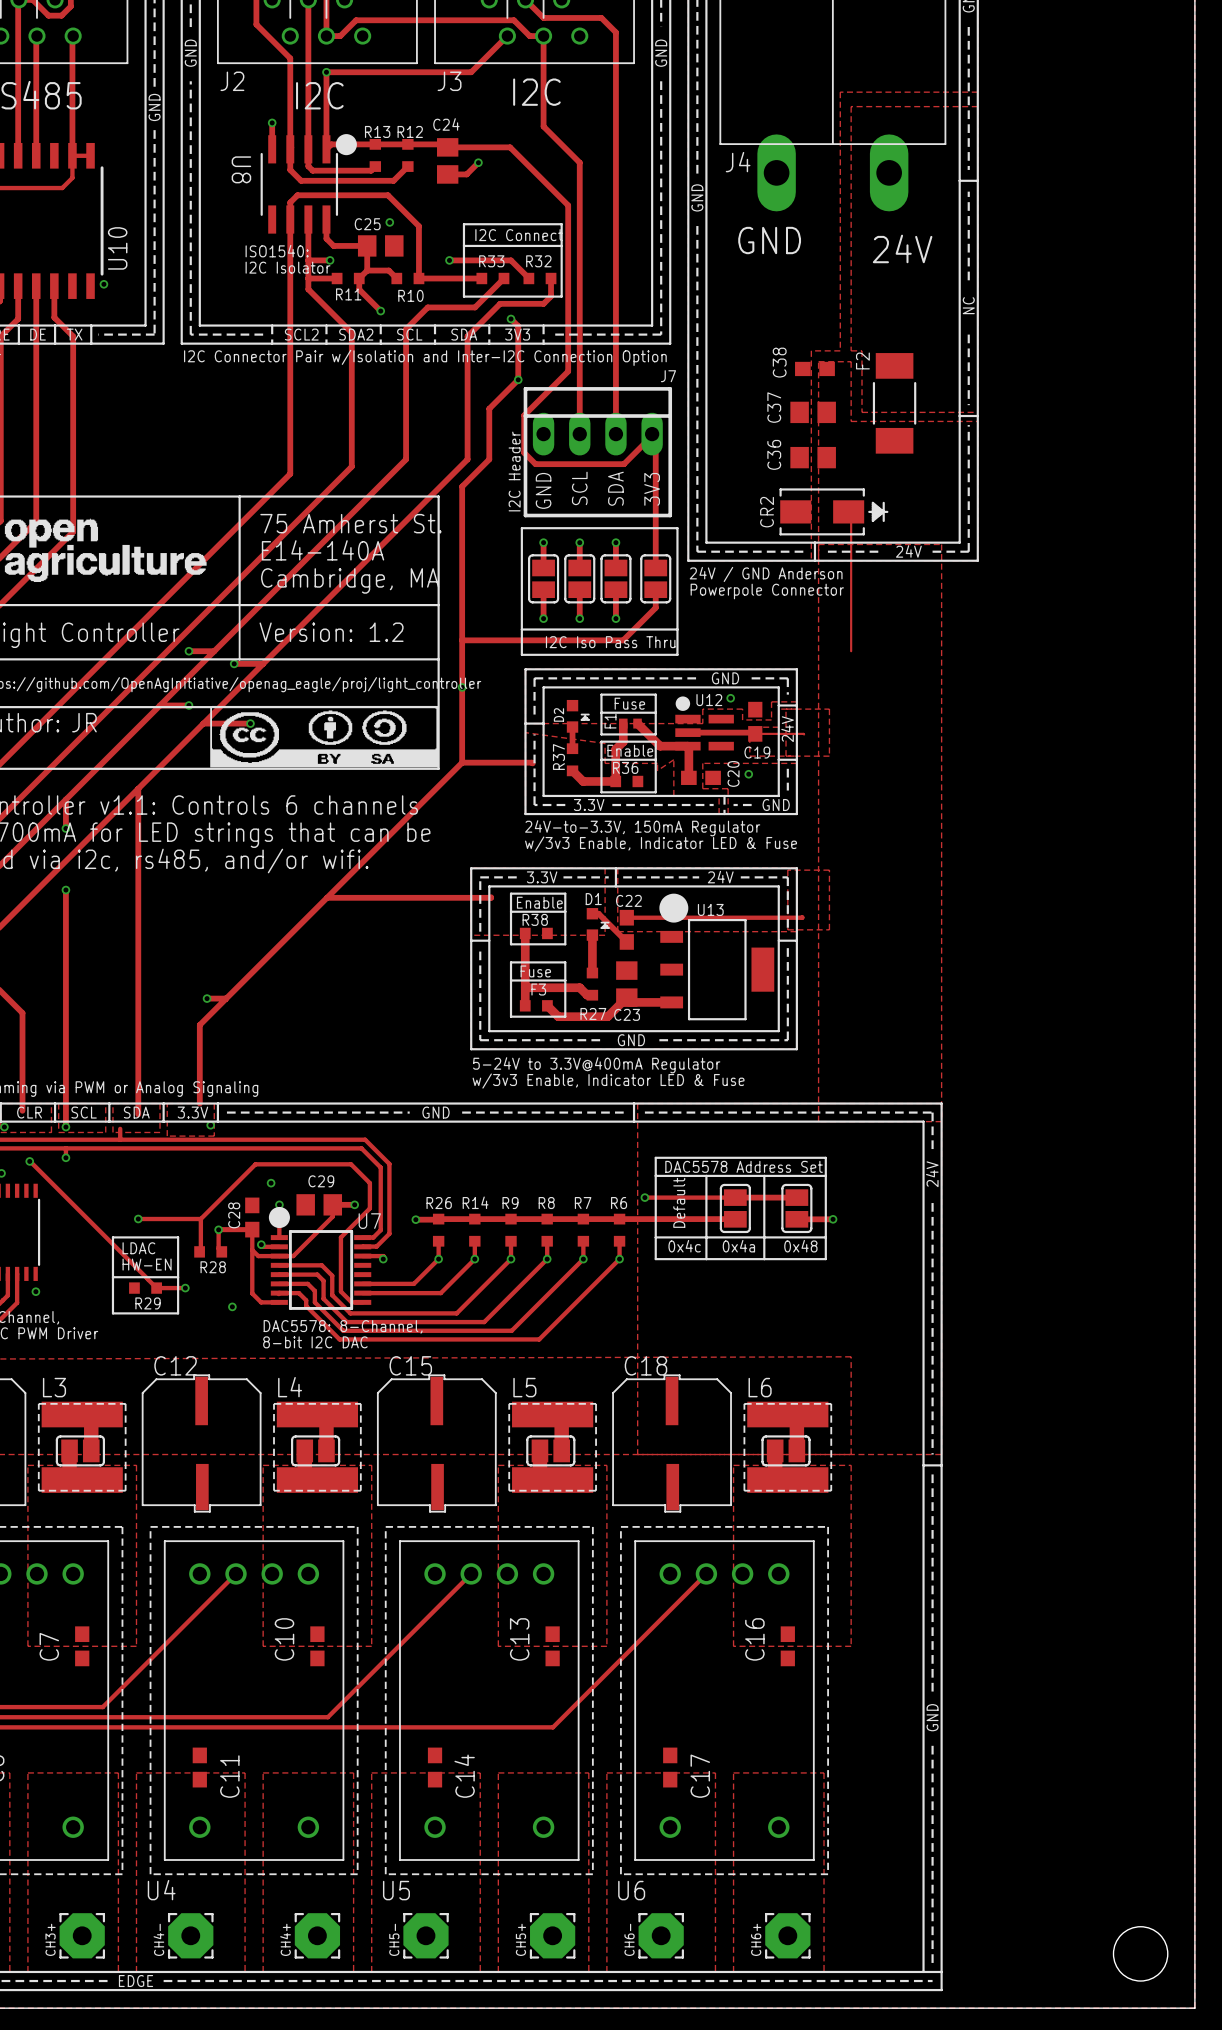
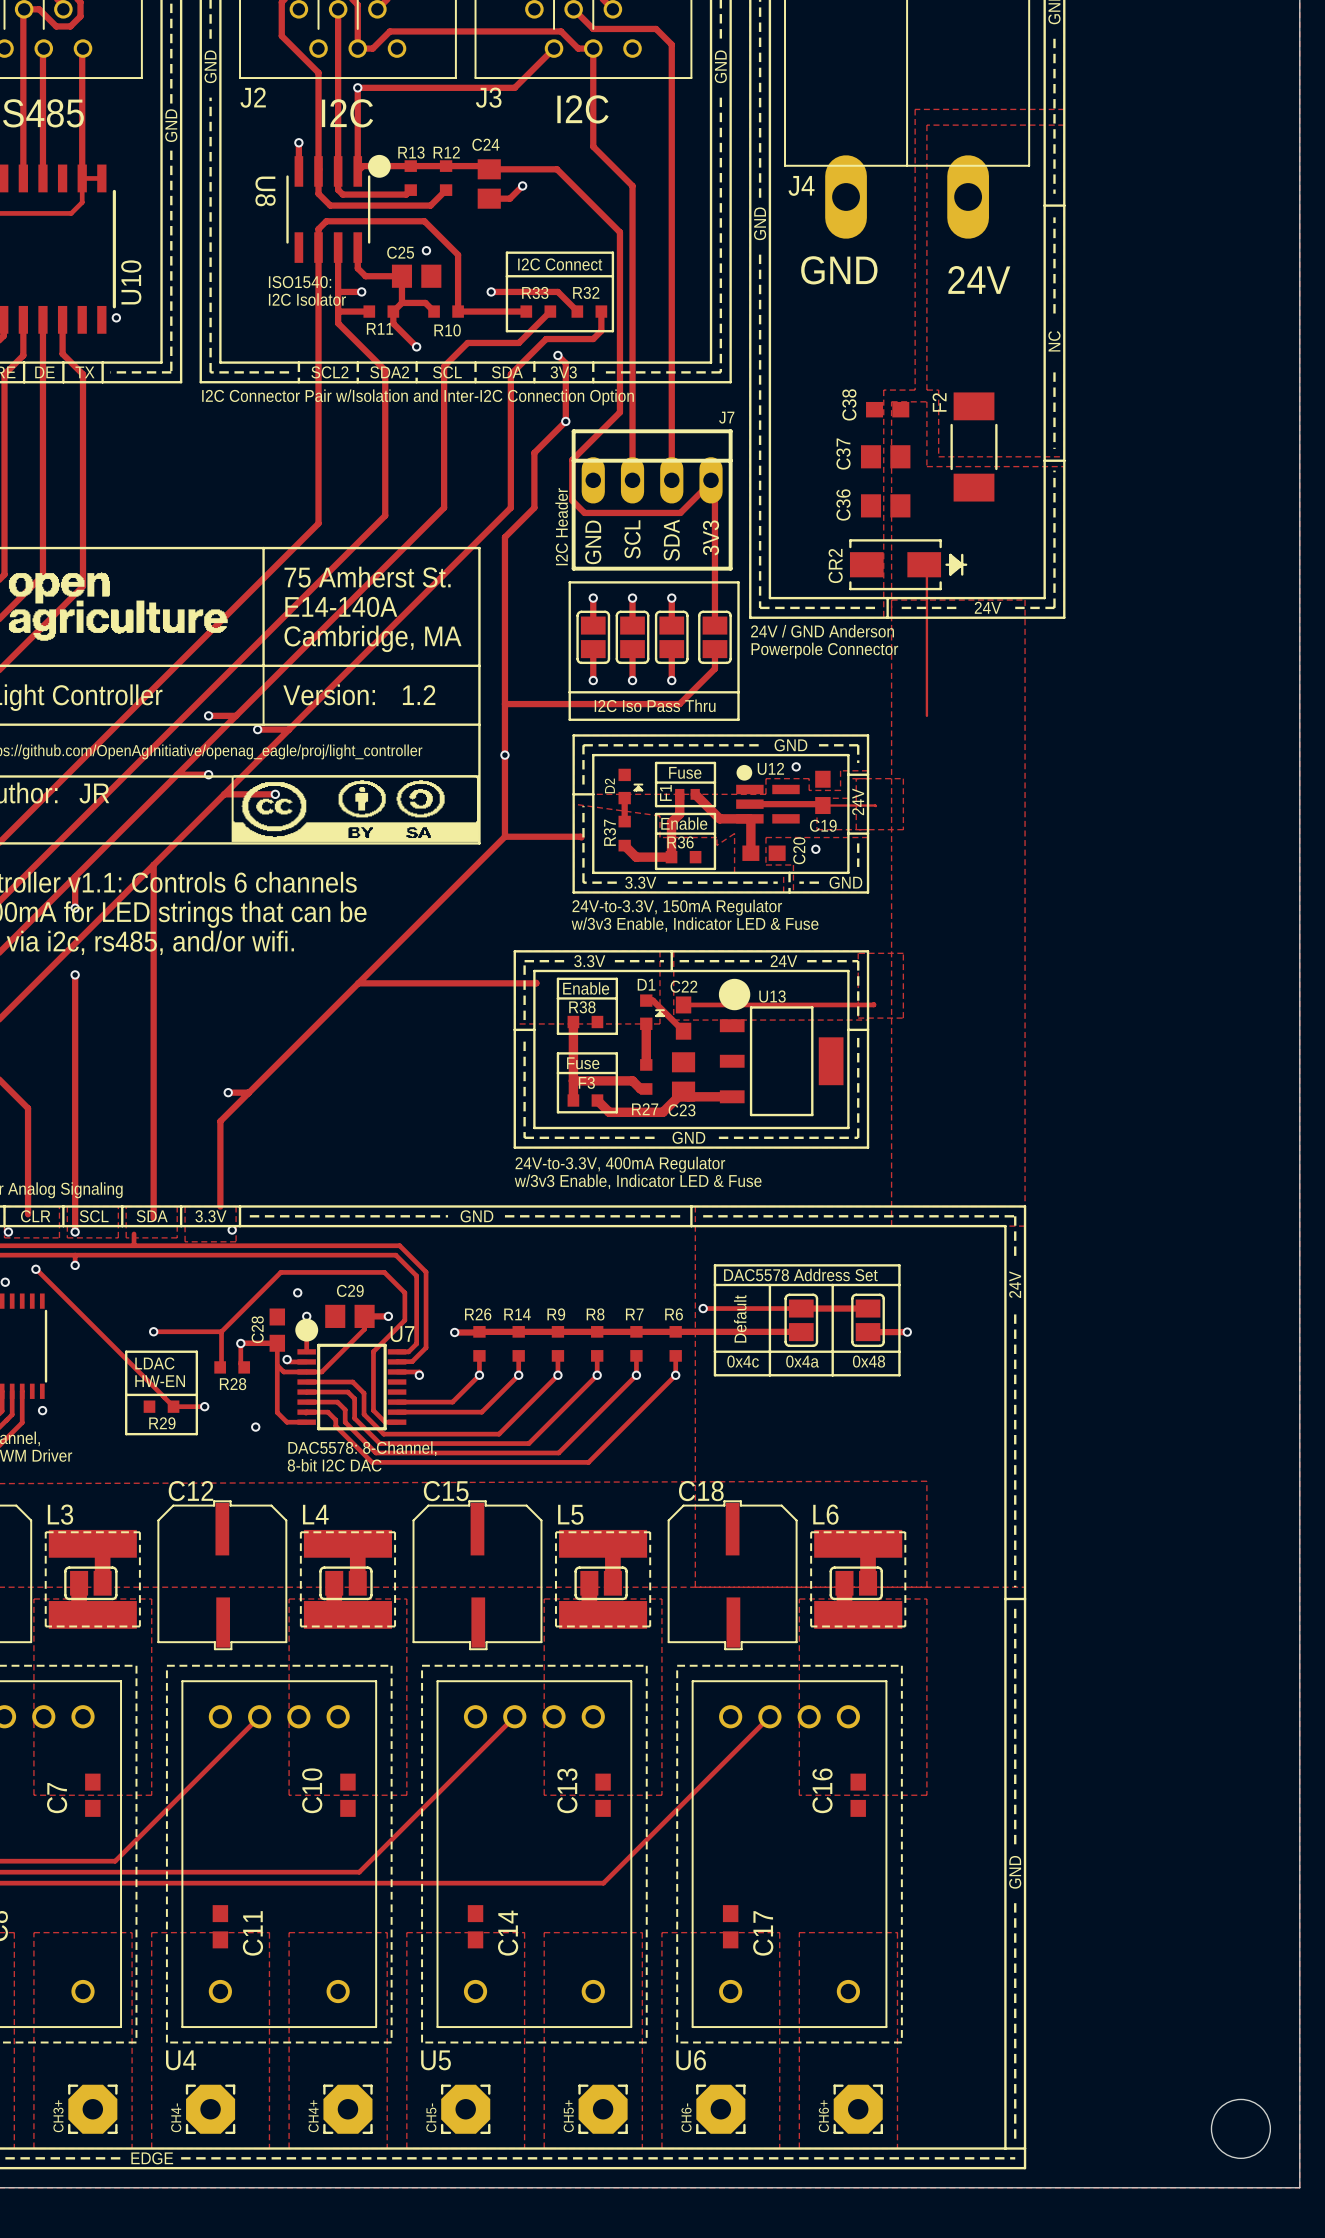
text: 5-24V to 3.3V@400mA Regulator (596, 1065) -> 24V-to-3.3V, 400mA Regulator (620, 1164)

